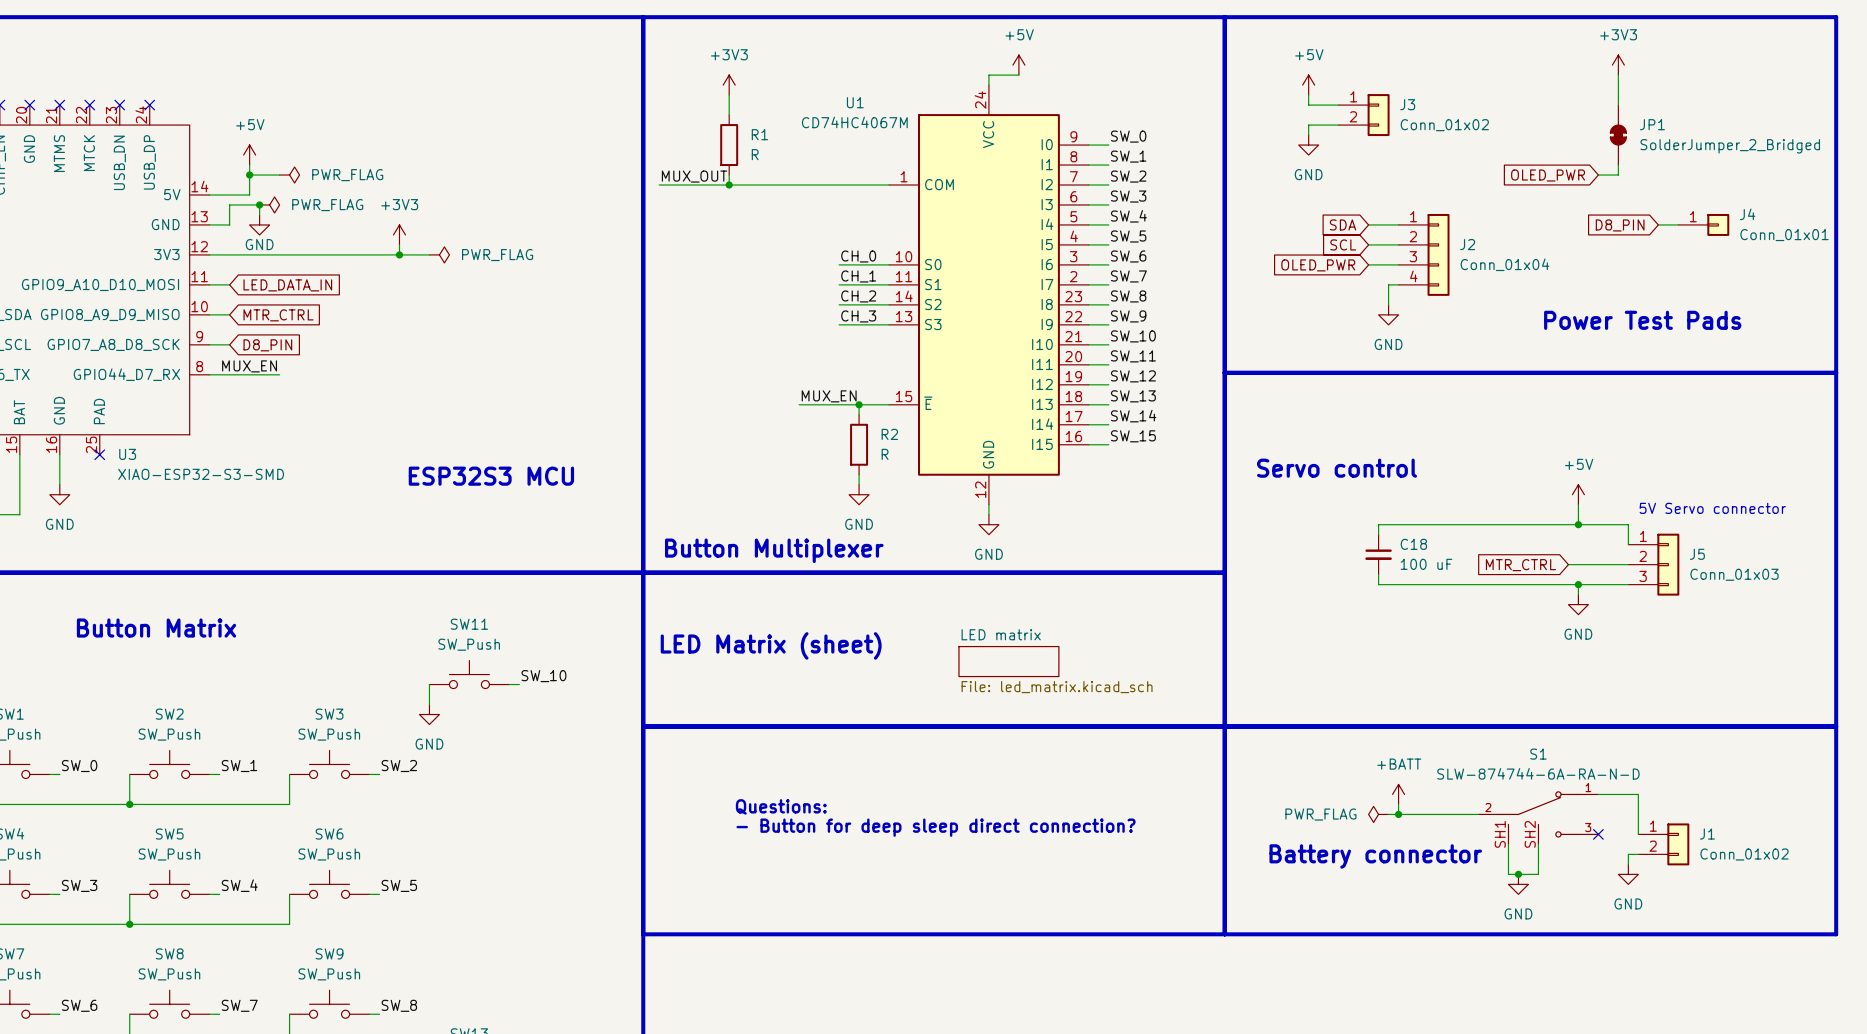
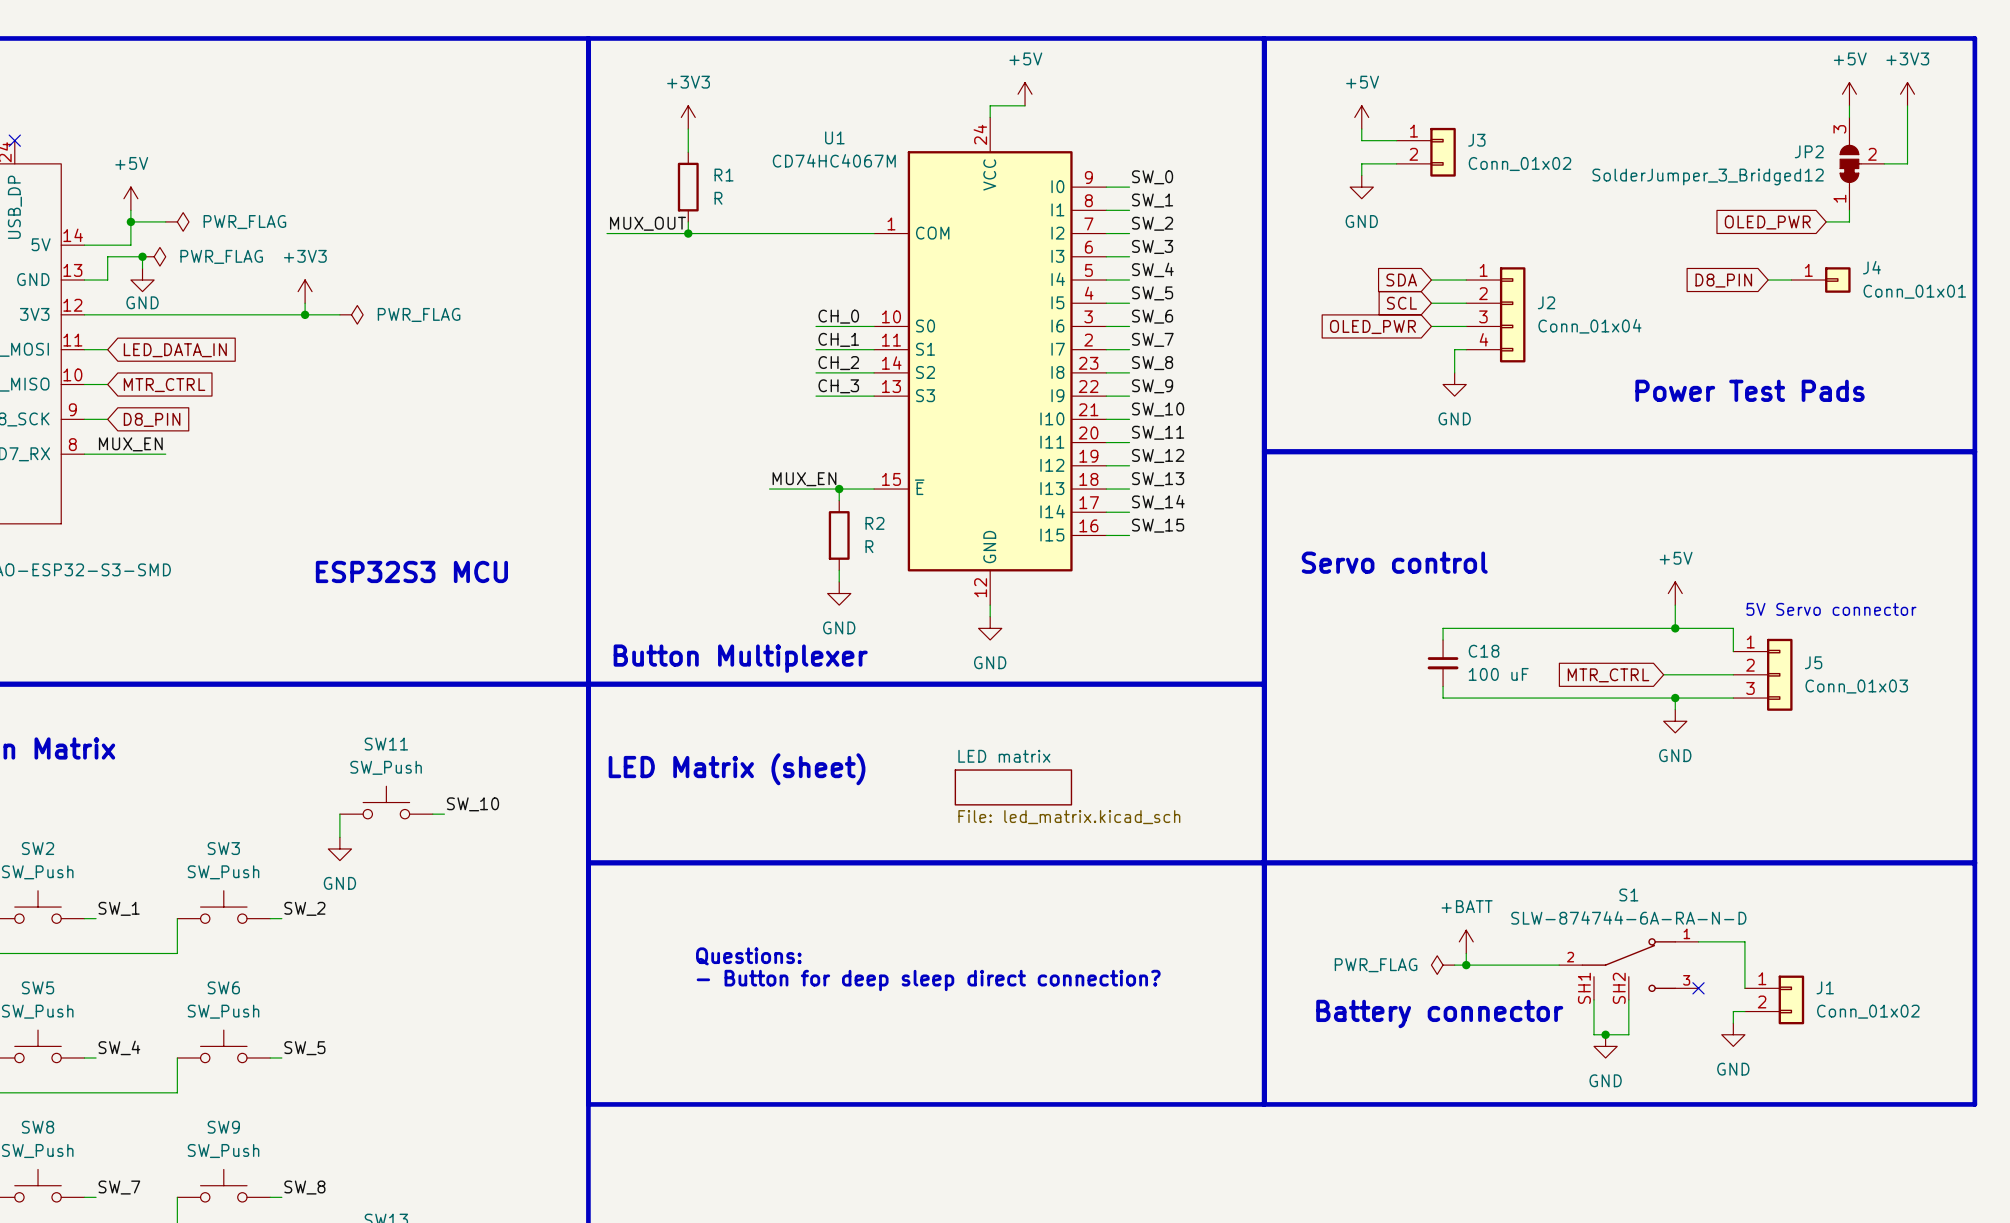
power symbol position: +3V3 (1618, 65) -> +3V3 (1907, 94)
power symbol: none -> +5V (1849, 94)
wire: (1618, 75) (1618, 105) -> none
wire: none -> (1849, 105) (1849, 117)
wire: none -> (1907, 105) (1907, 163) (1884, 163)
JP2: none -> SolderJumper_3_Bridged12 (1862, 163)
JP1: SolderJumper_2_Bridged (1618, 135) -> none
wire: (1618, 165) (1618, 175) (1598, 175) -> (1849, 210) (1849, 221) (1826, 221)
global label position: OLED_PWR (1548, 175) -> OLED_PWR (1767, 222)

